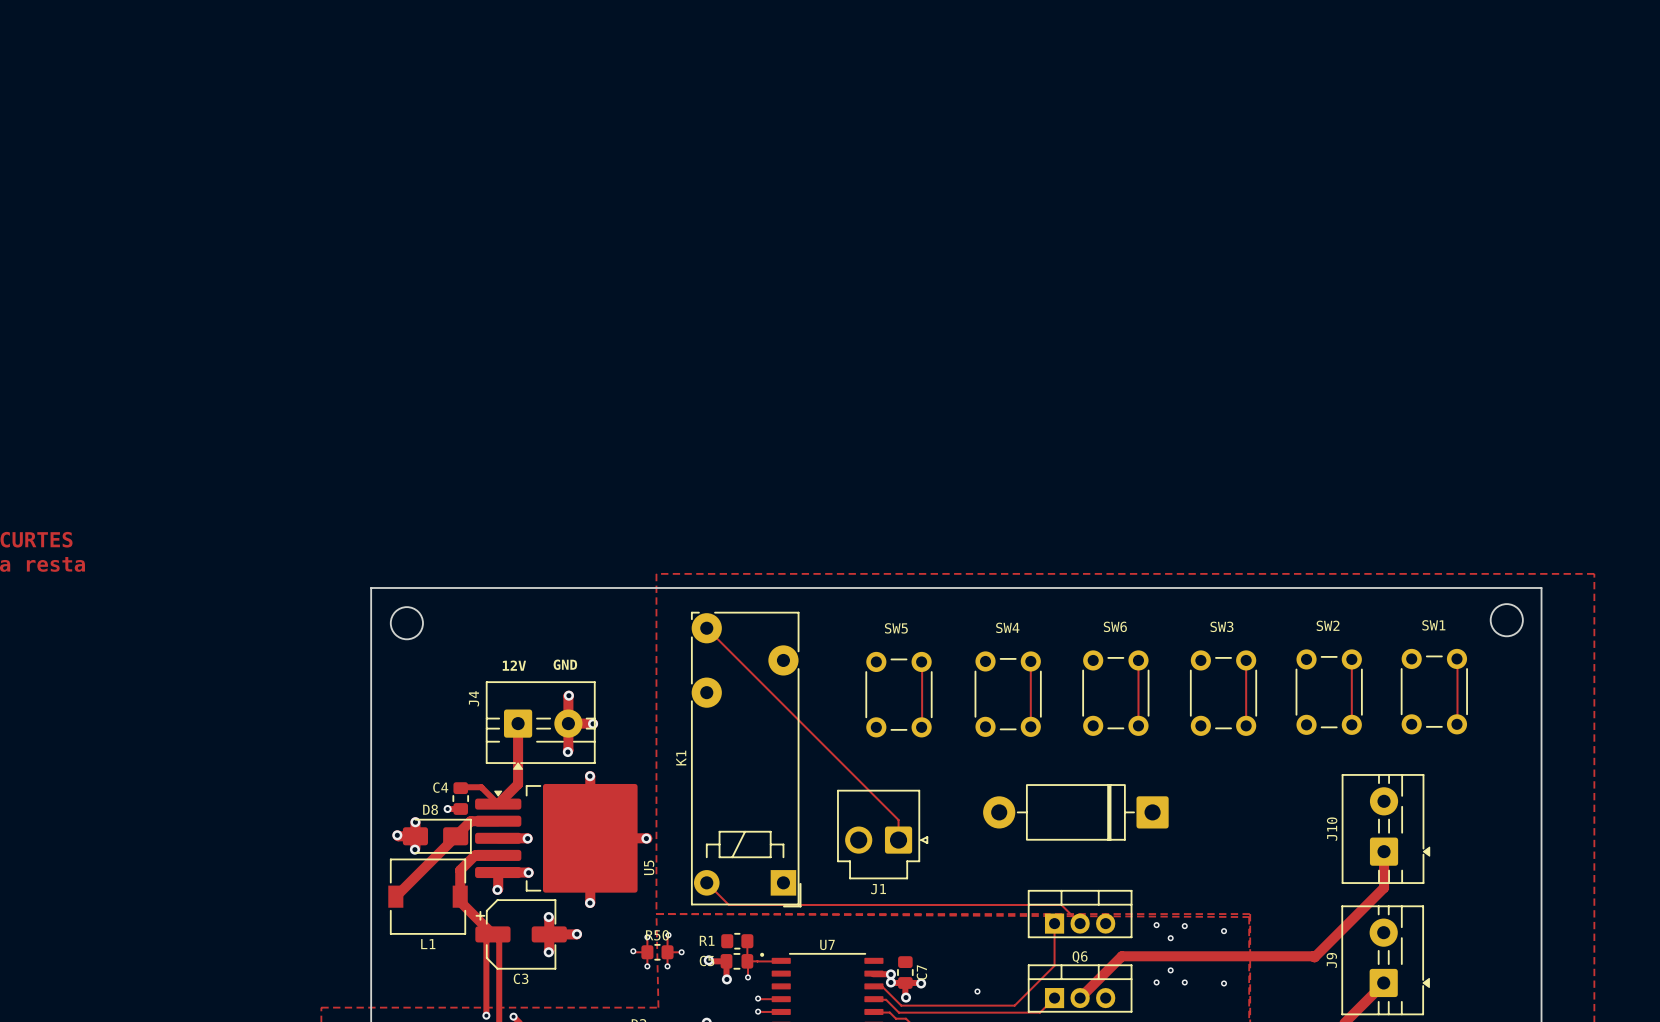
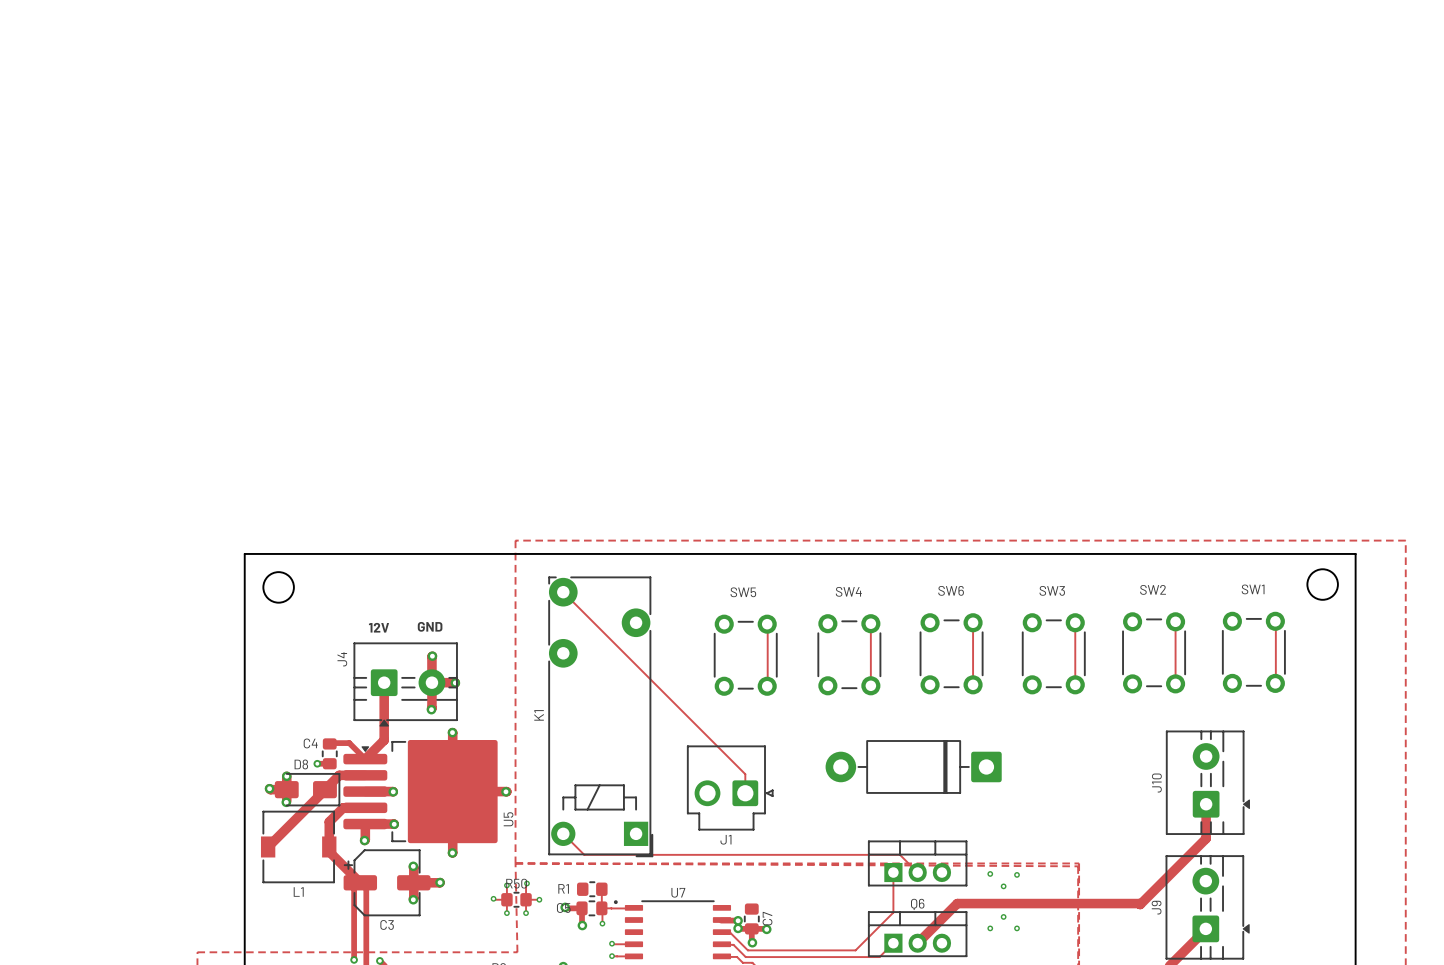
via: (1224, 931) -> none
via: (1224, 983) -> none
via: (977, 991) -> none

